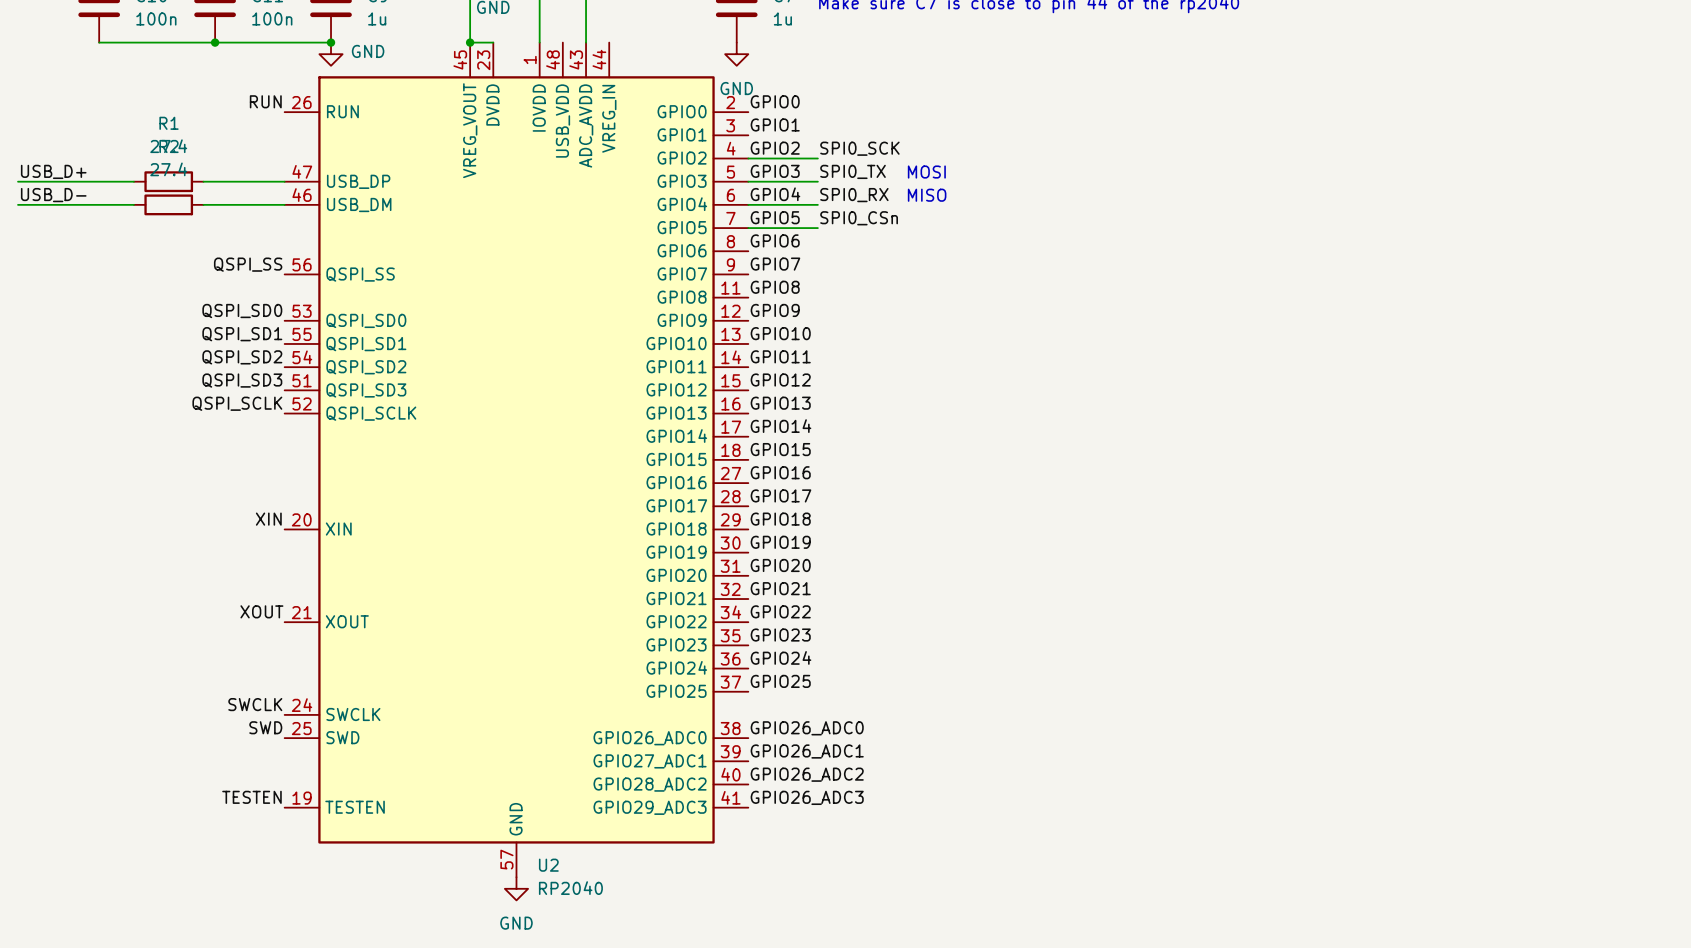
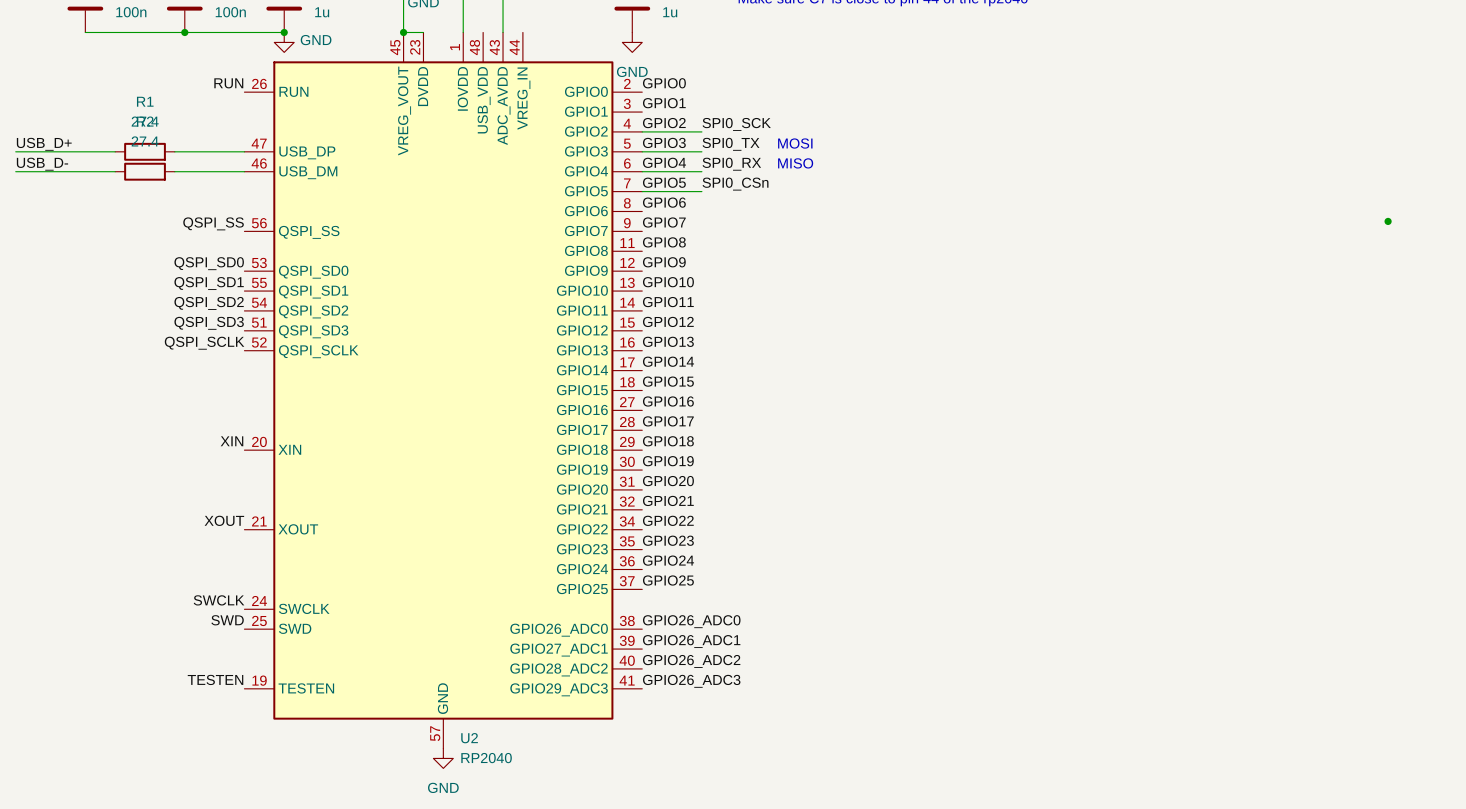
junction: none -> (1388, 221)

